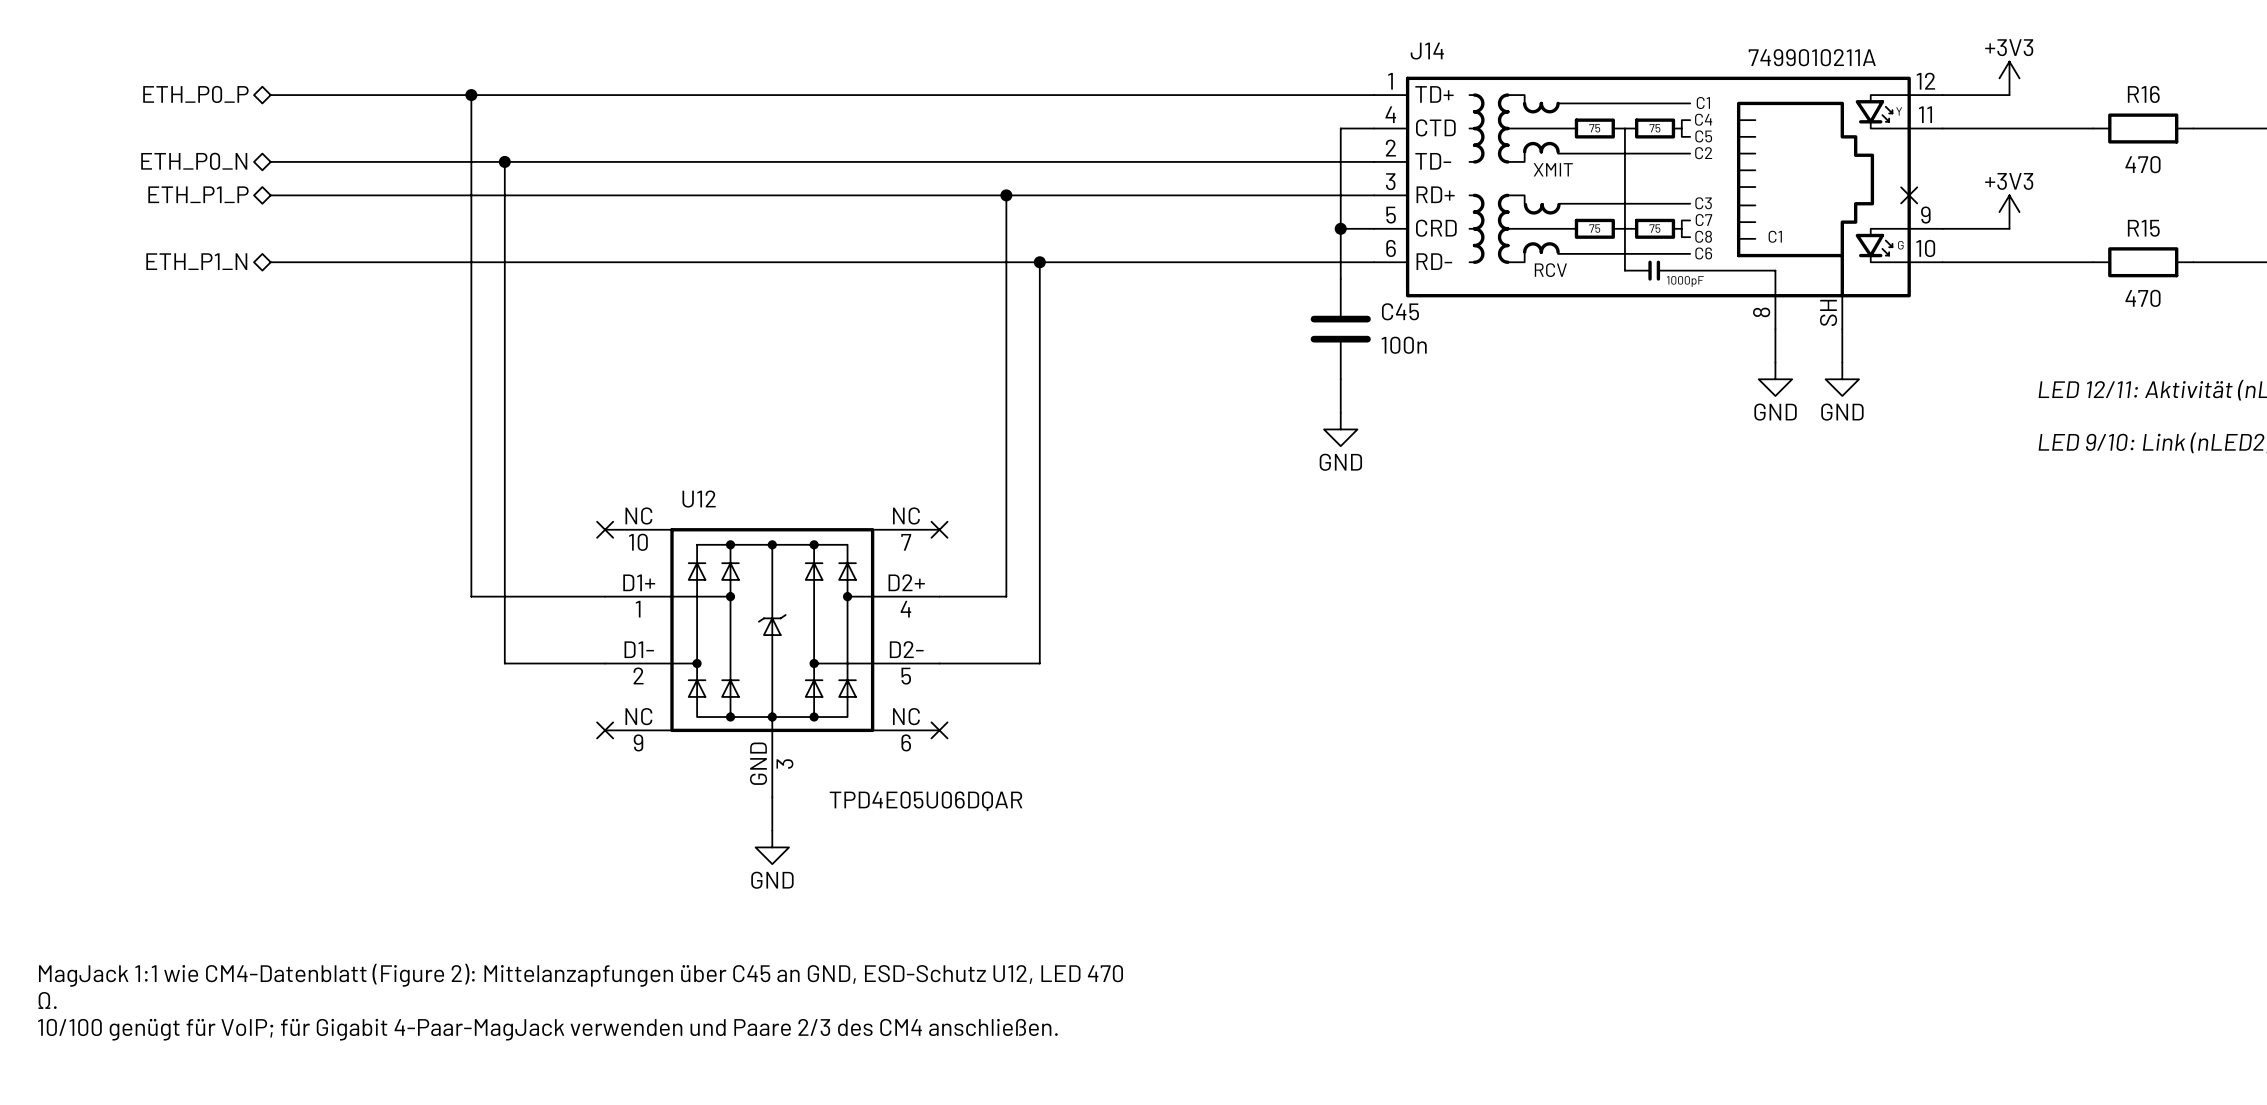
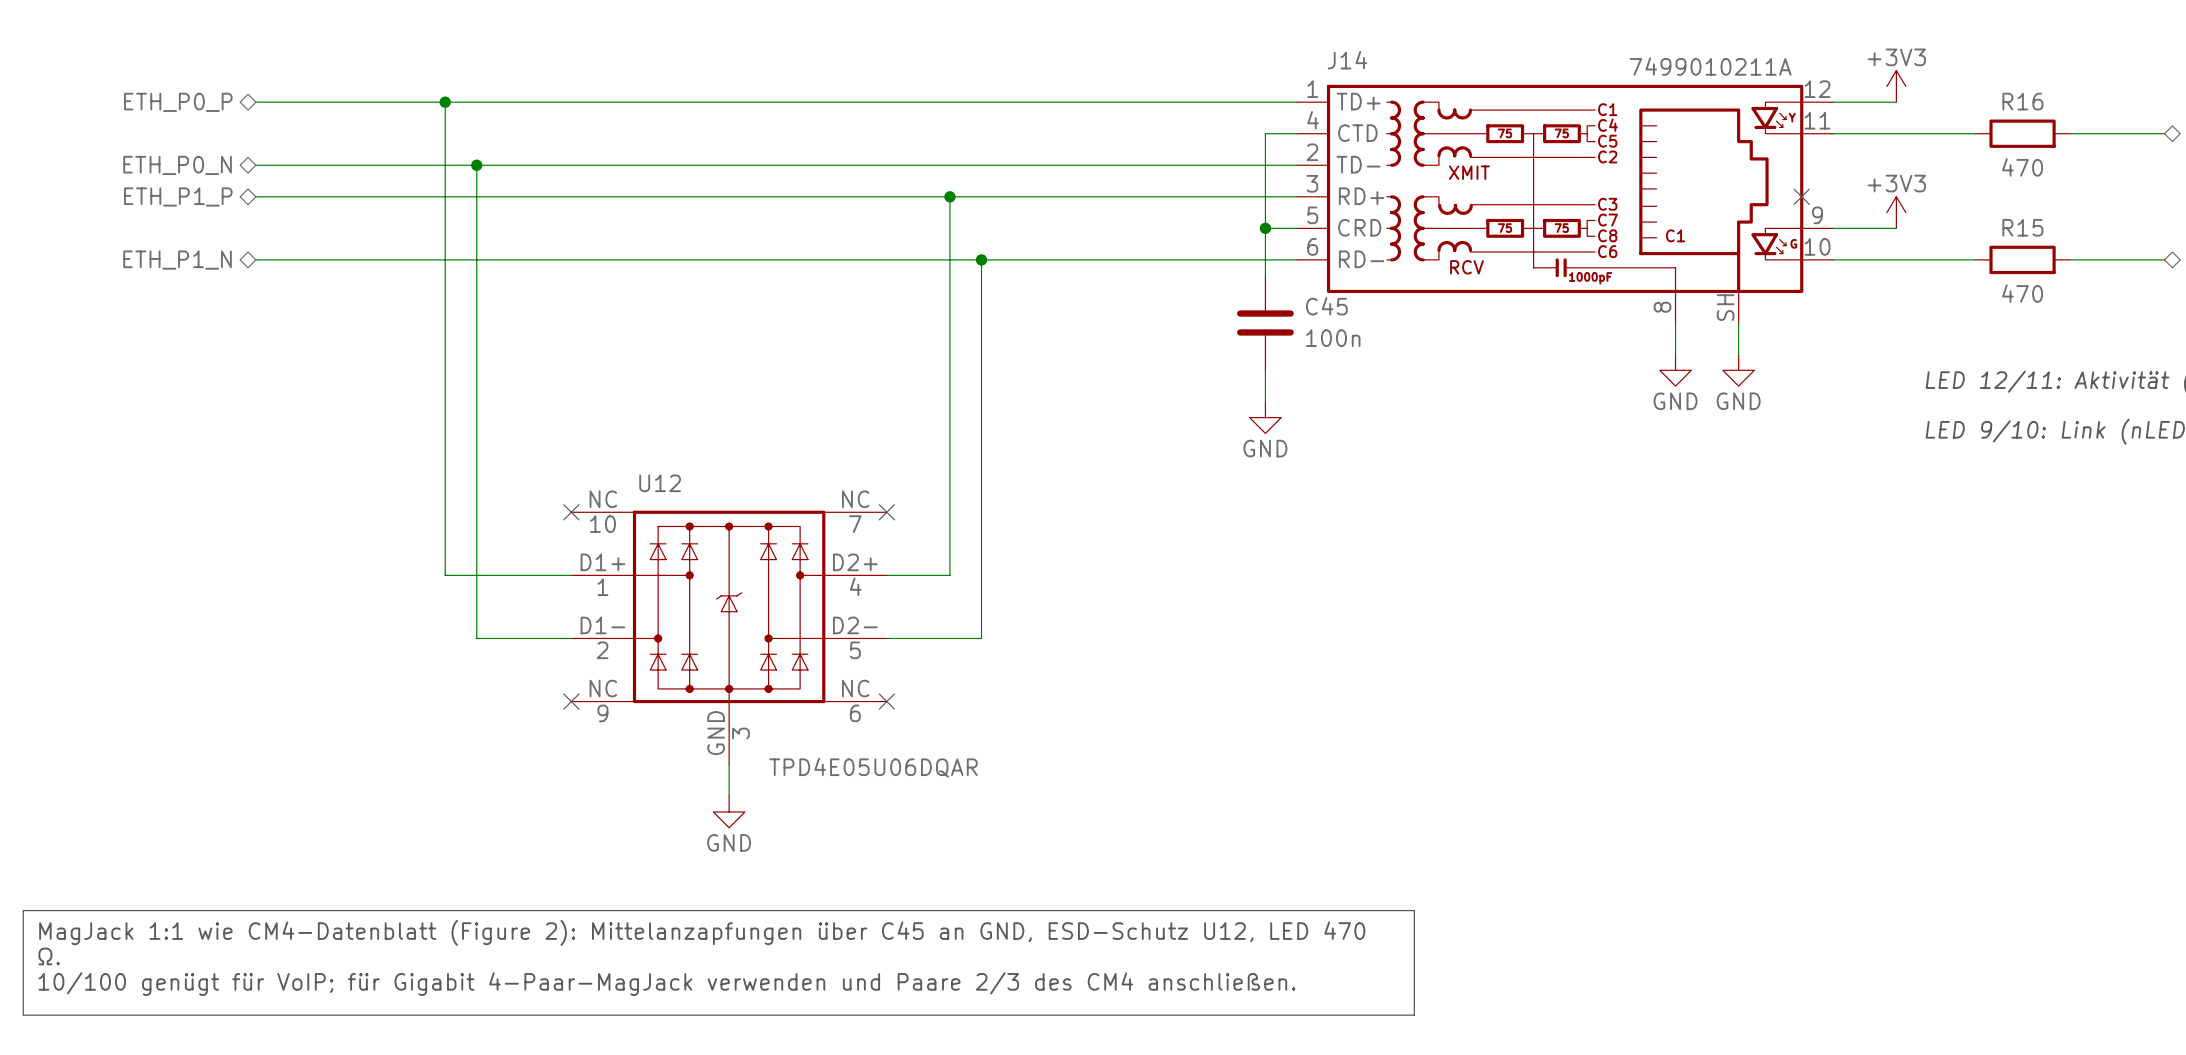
line: none -> (23, 910) (1414, 910) (1414, 1015) (23, 1015) (23, 910)

